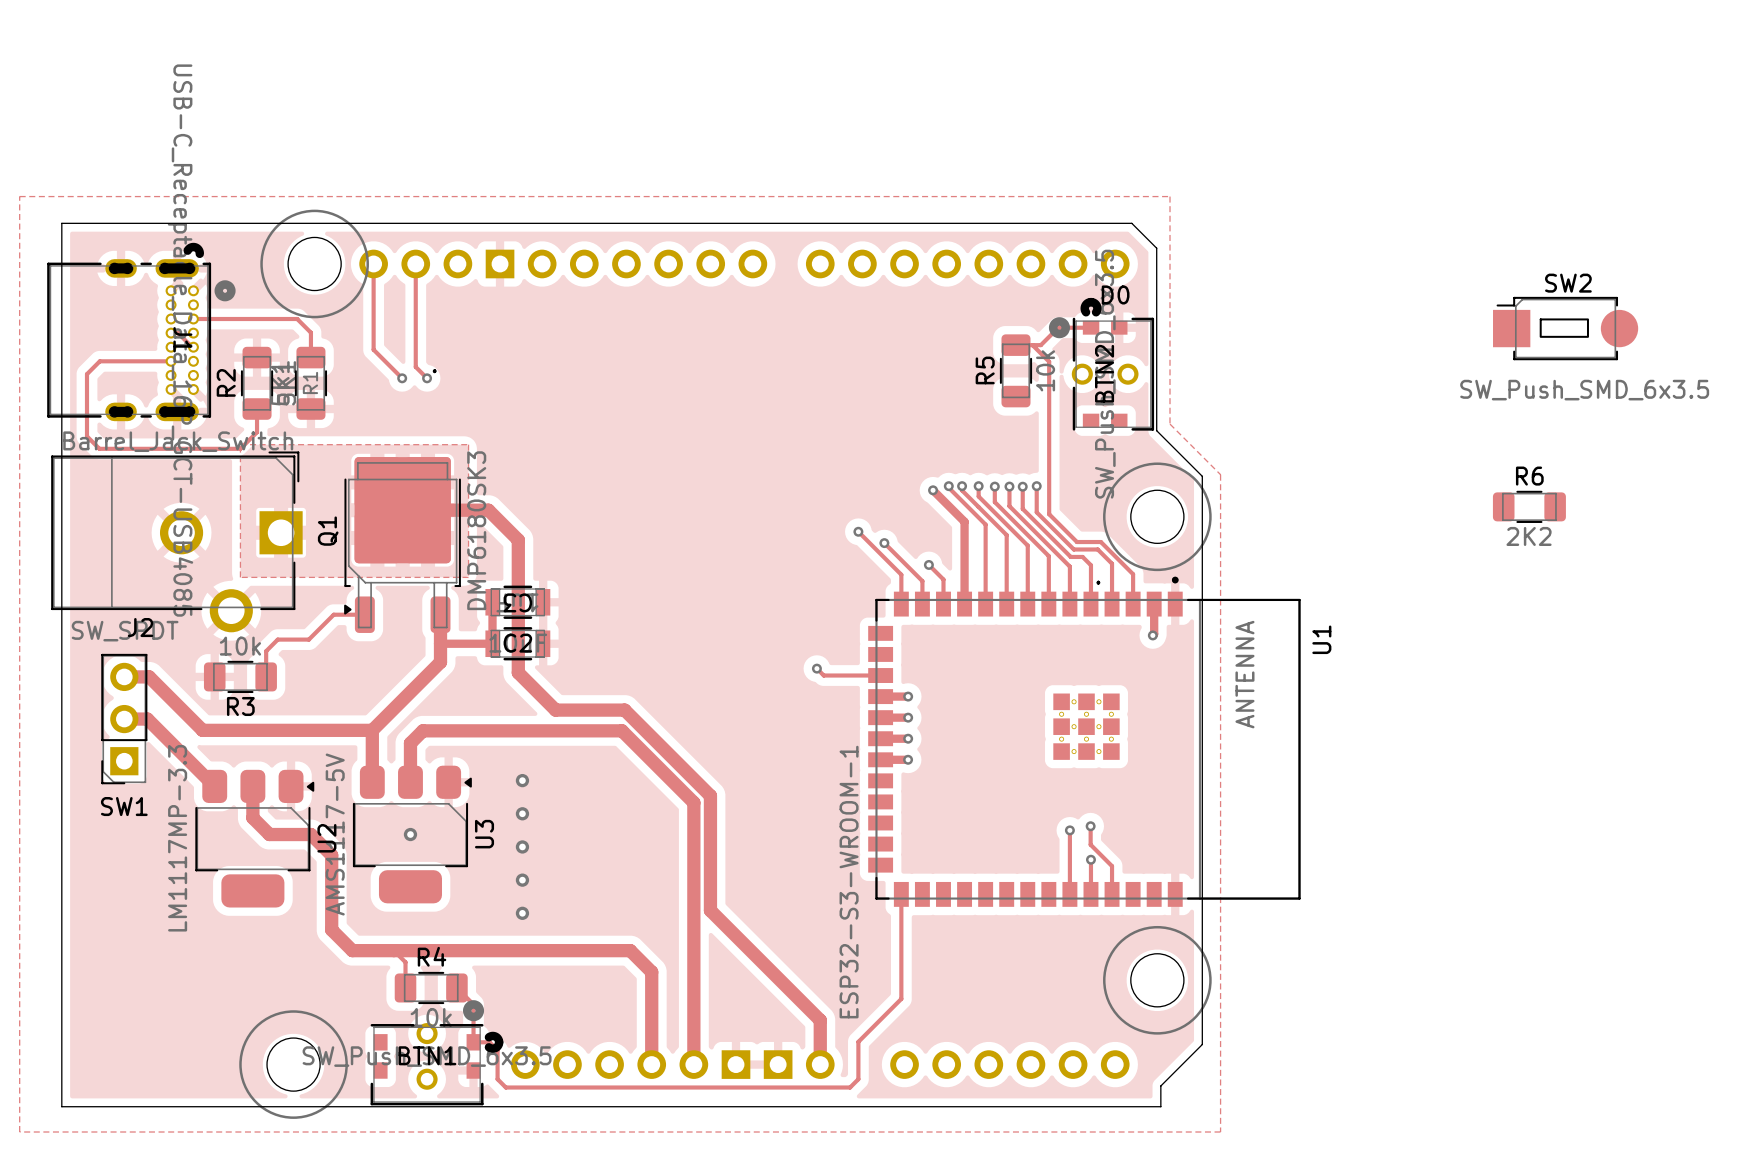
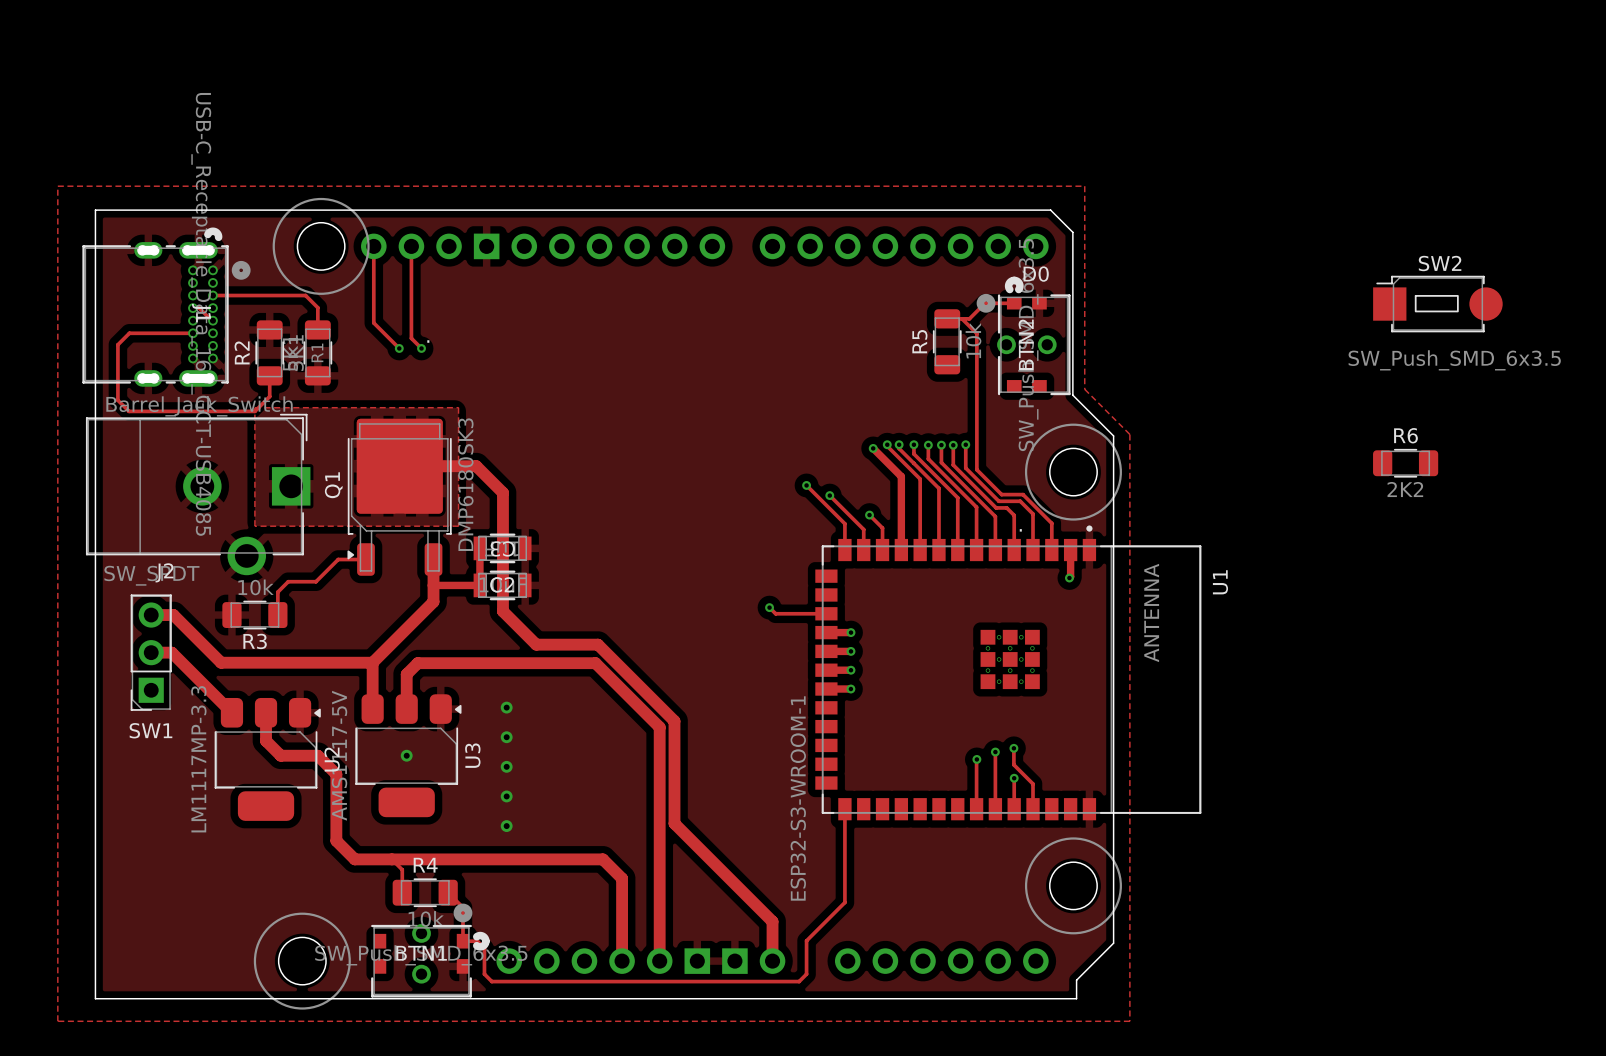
track: none -> (976, 759) (976, 809)
via: none -> (976, 759)

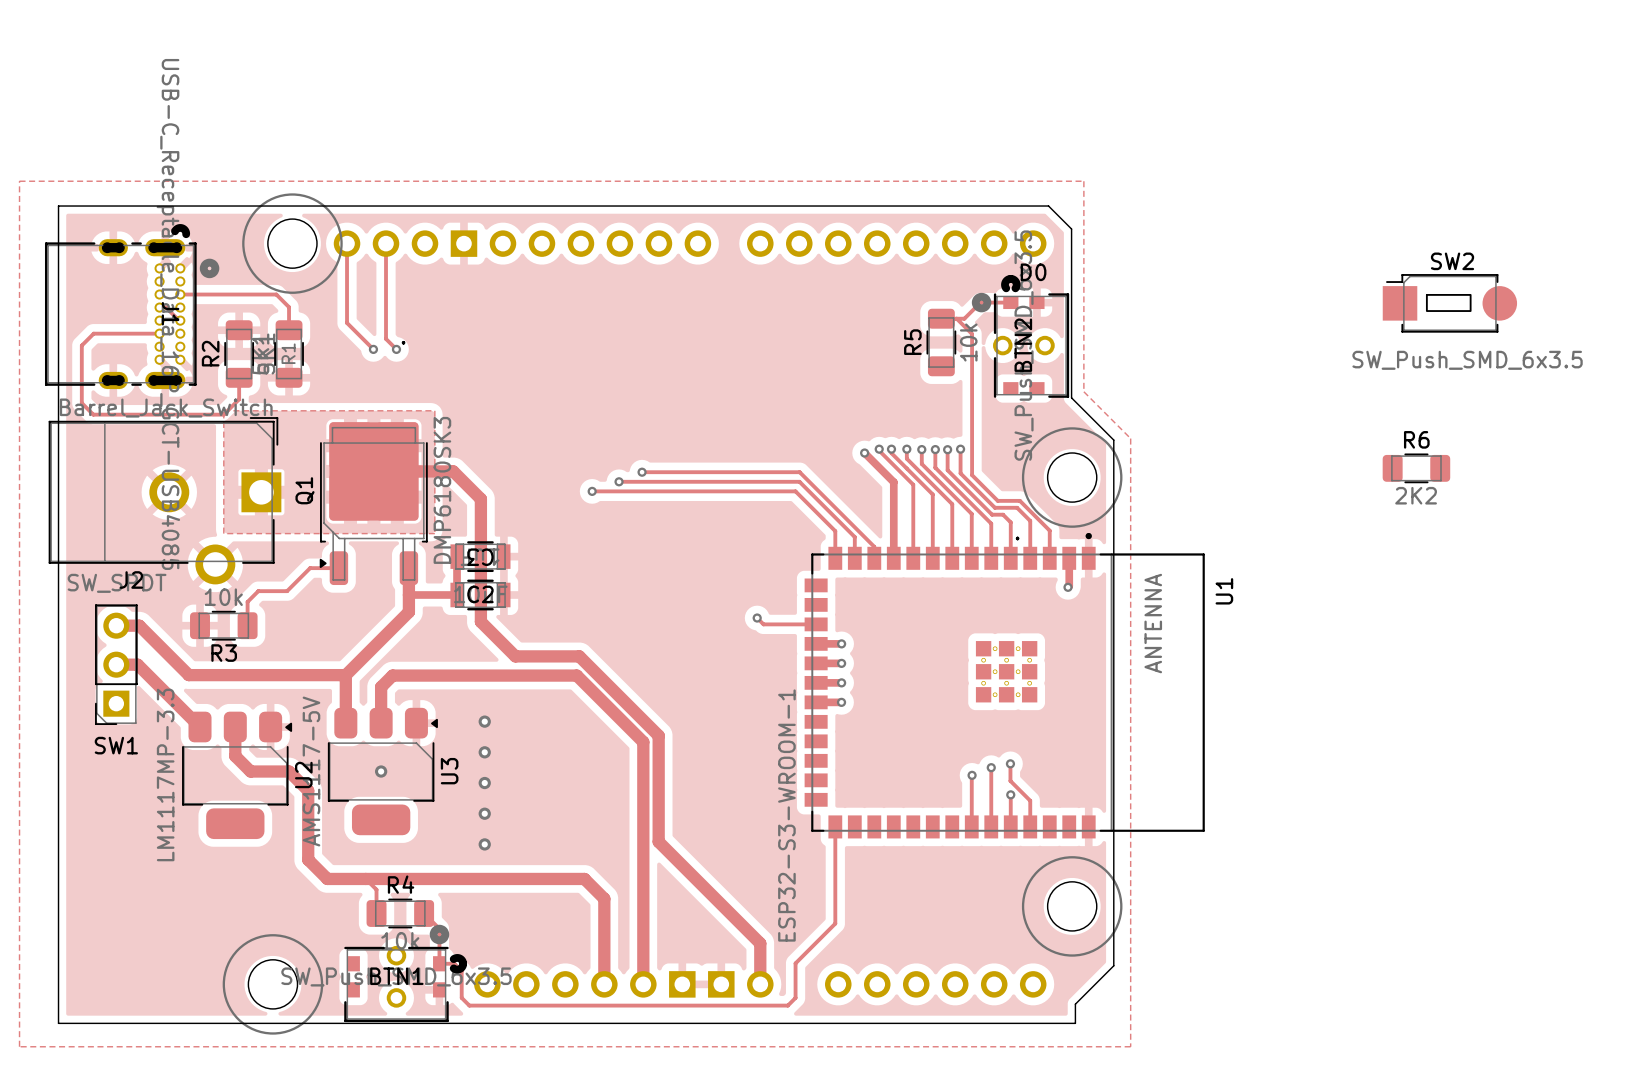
via: none -> (642, 472)
track: none -> (619, 481) (799, 481) (819, 501)
via: none -> (619, 481)
track: none -> (592, 491) (795, 491)
via: none -> (592, 491)
via: (806, 485) -> none
via: (829, 495) -> none
track: (869, 515) (882, 528) (882, 538) -> (642, 472) (799, 472) (874, 546)
via: (869, 515) -> none

